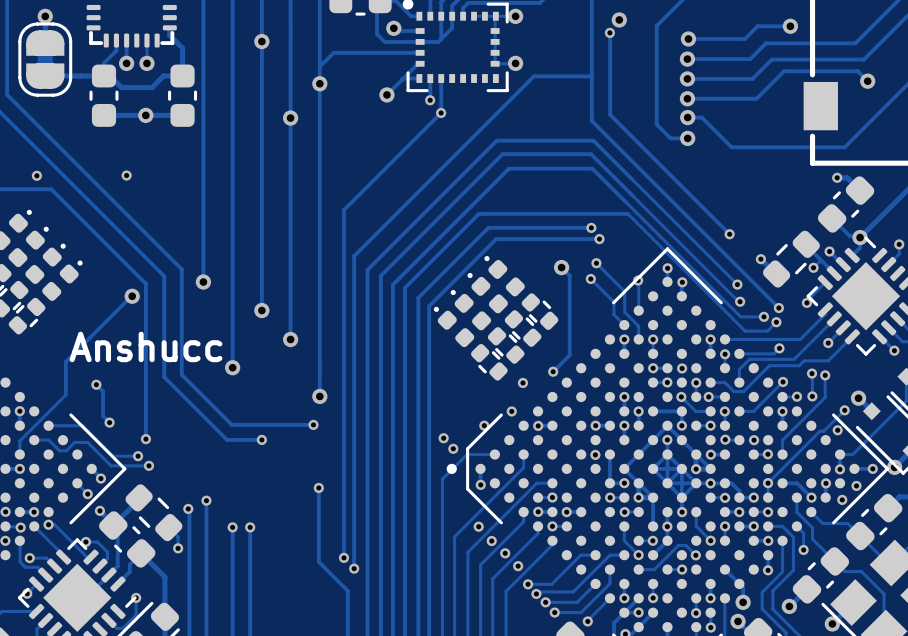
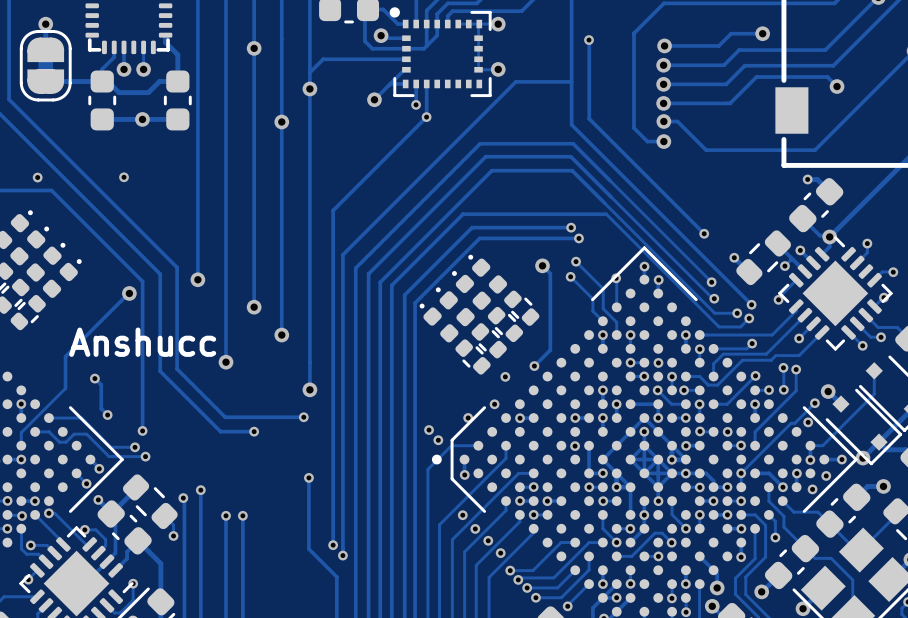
via: (619, 19) -> none

